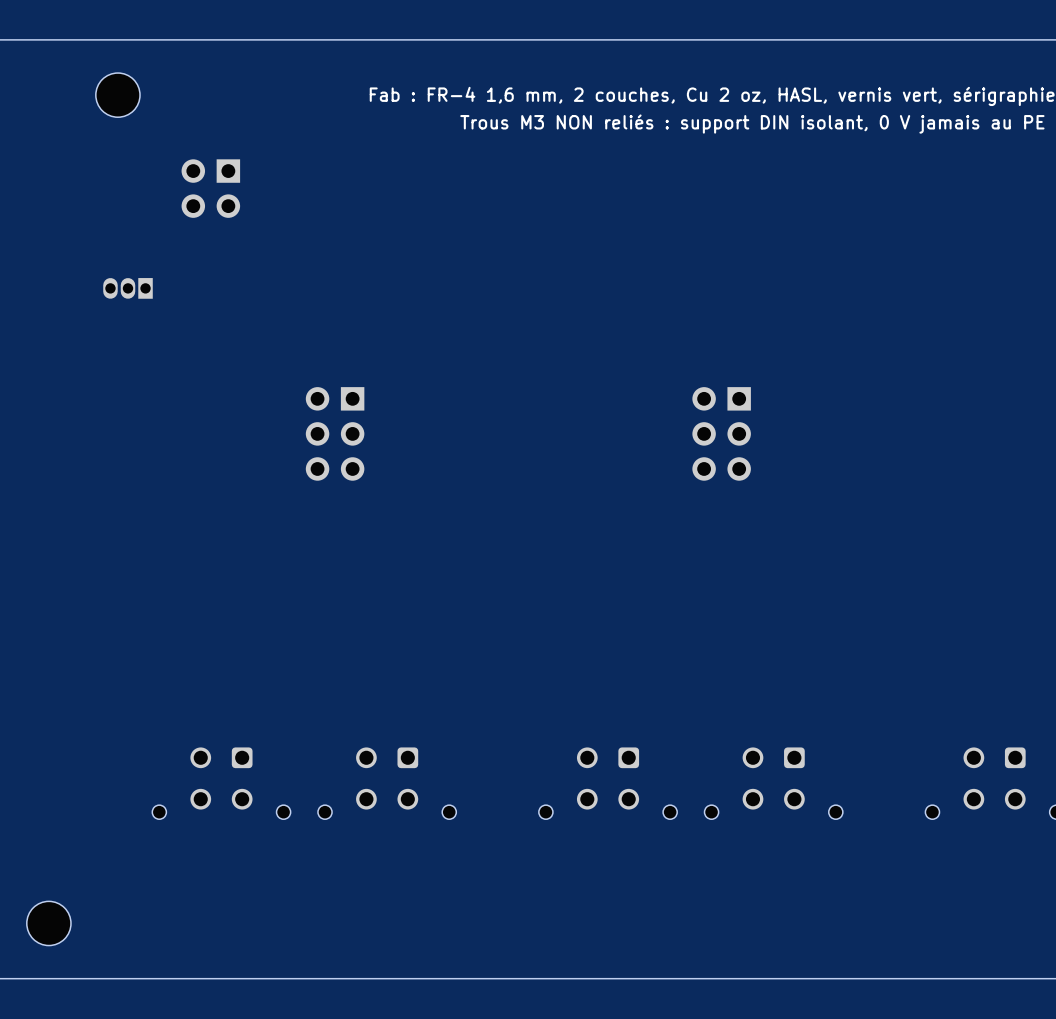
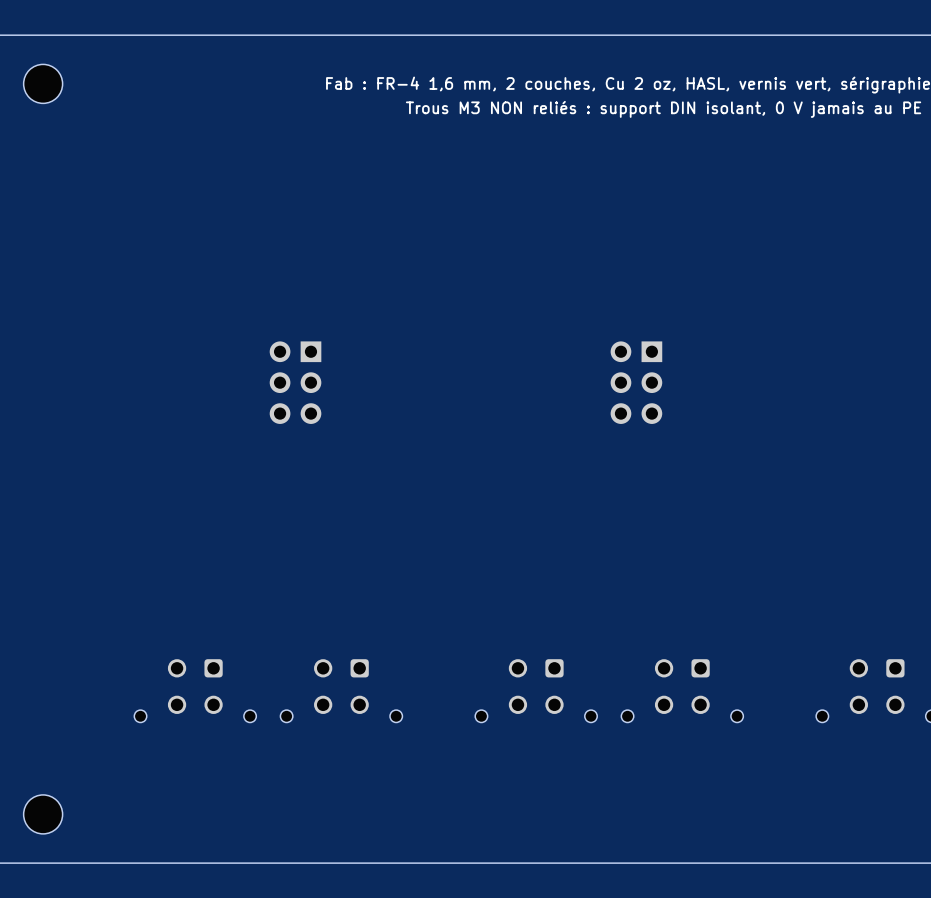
part position: (117, 95) -> (43, 83)
part: (210, 188) -> none
part: (128, 288) -> none

